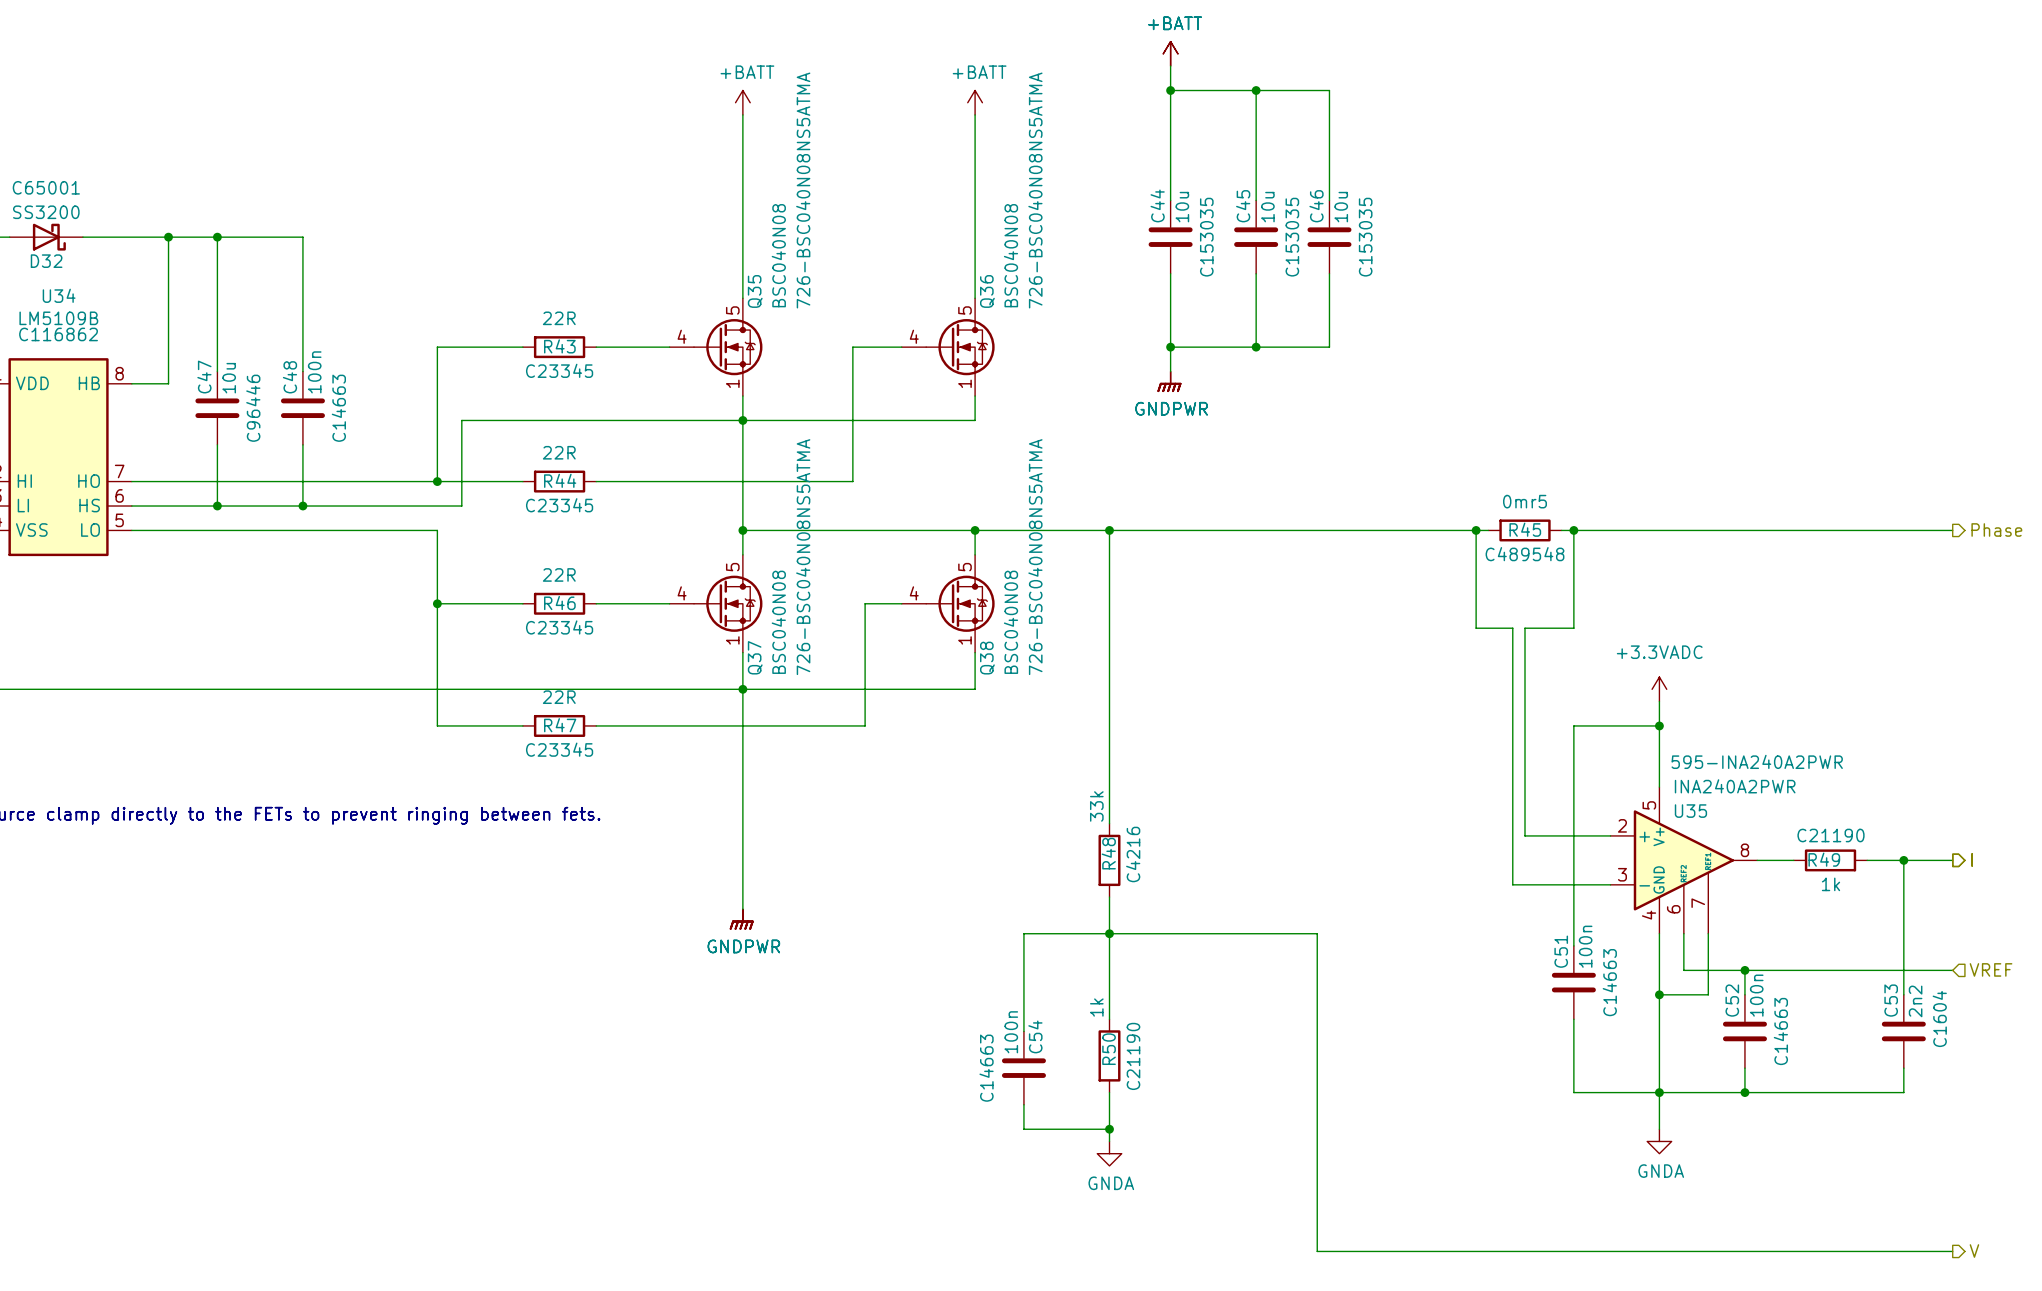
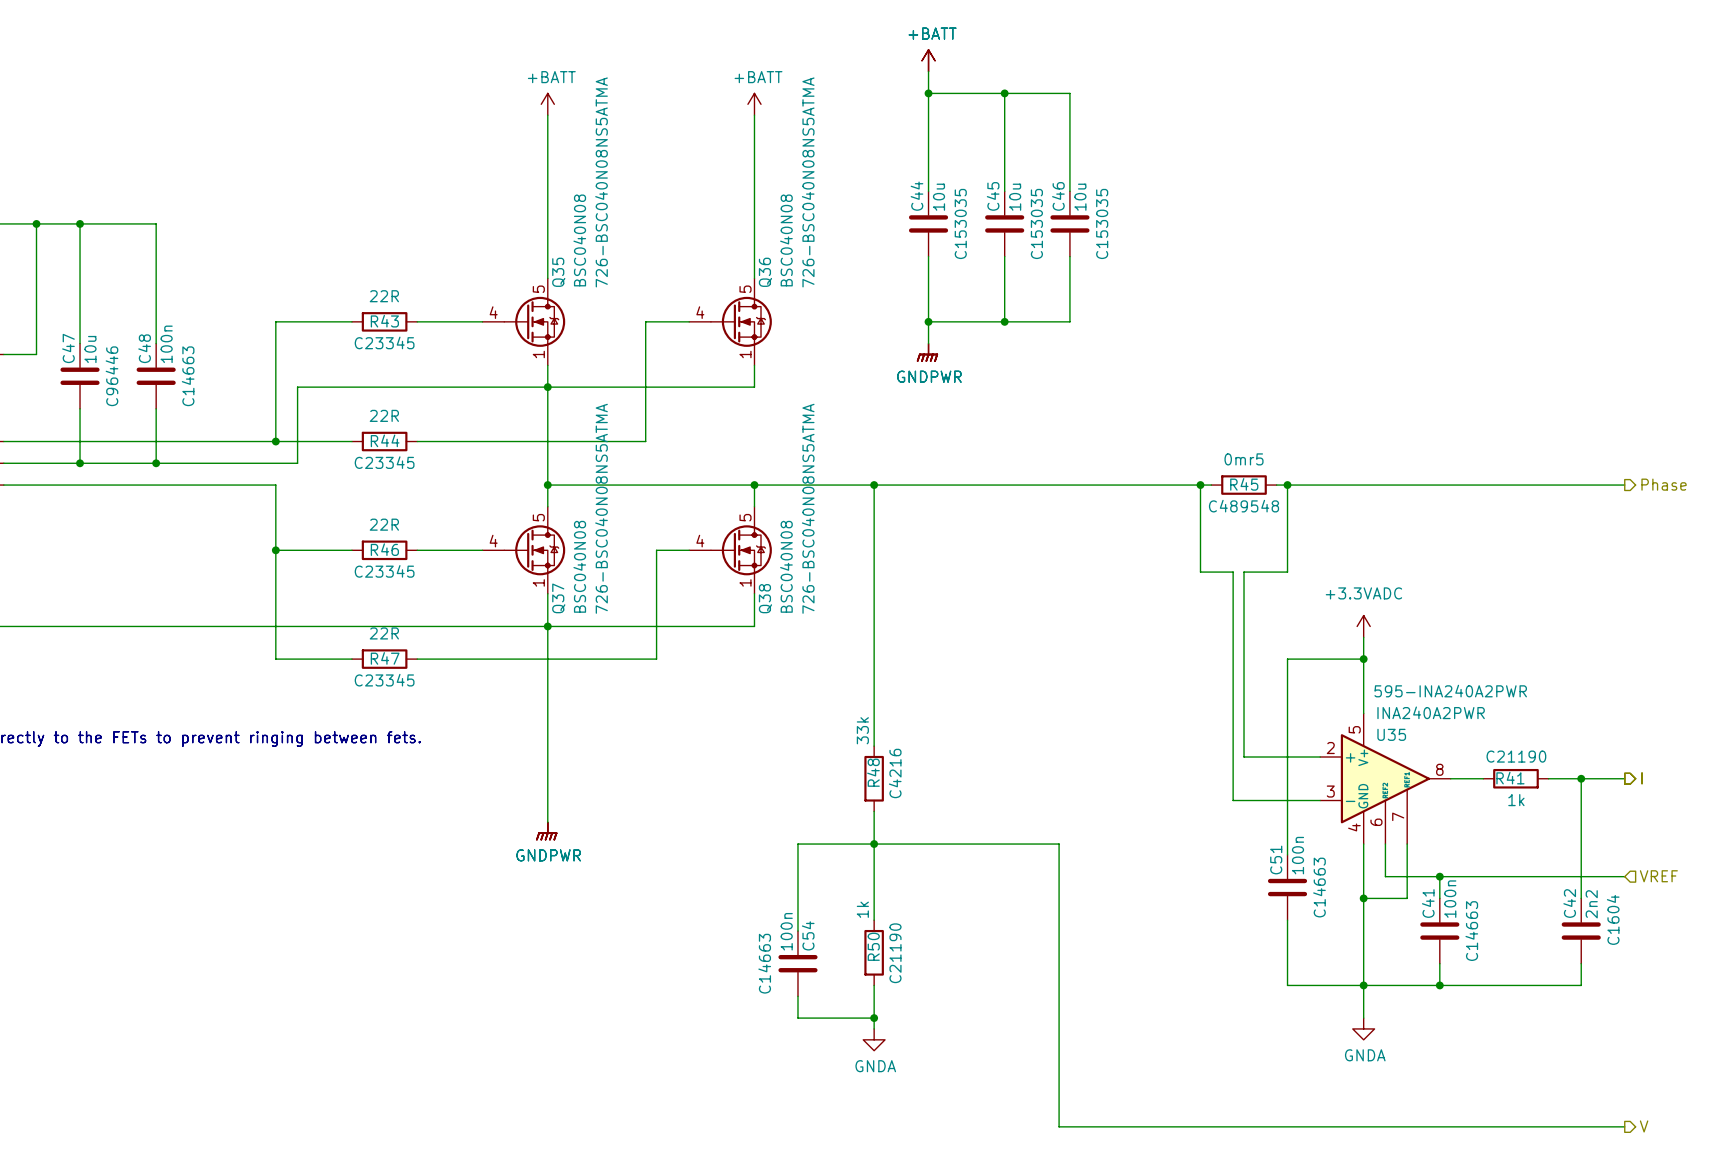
R49 name: R49 (1824, 859) -> R41 (1510, 778)
C52 name: C52 (1732, 1000) -> C41 (1428, 903)
C53 name: C53 (1891, 1000) -> C42 (1569, 903)

